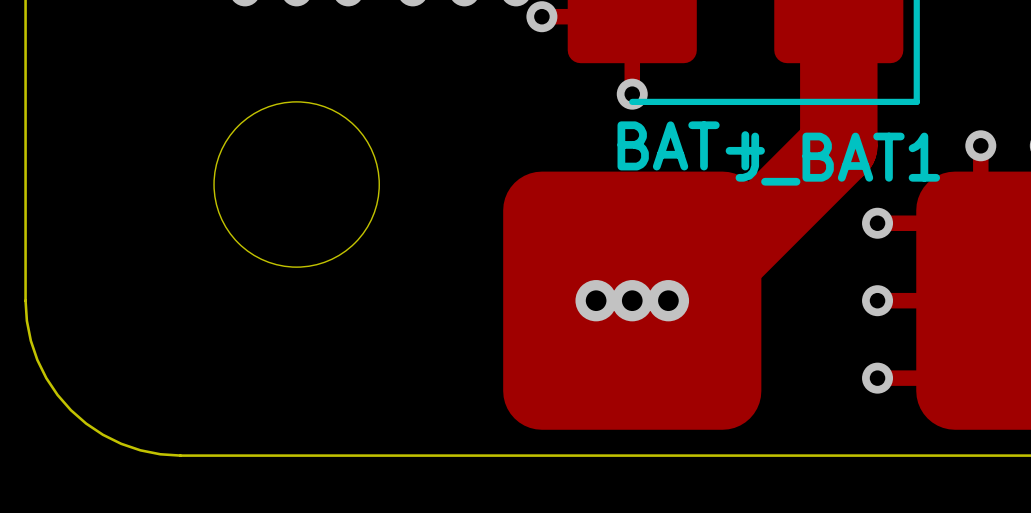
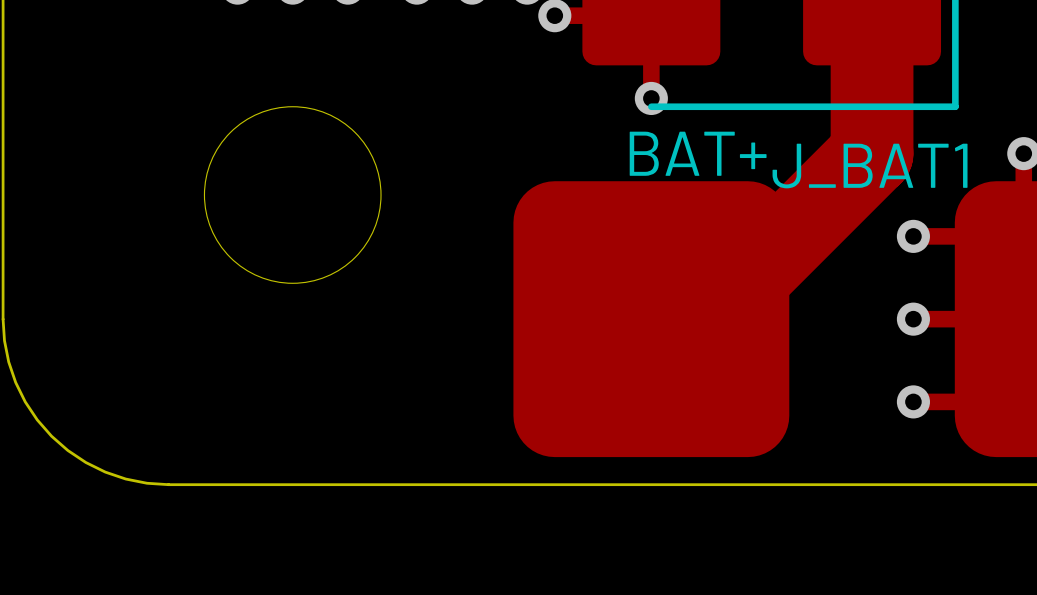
via: (596, 300) -> none
via: (632, 300) -> none
via: (668, 300) -> none

